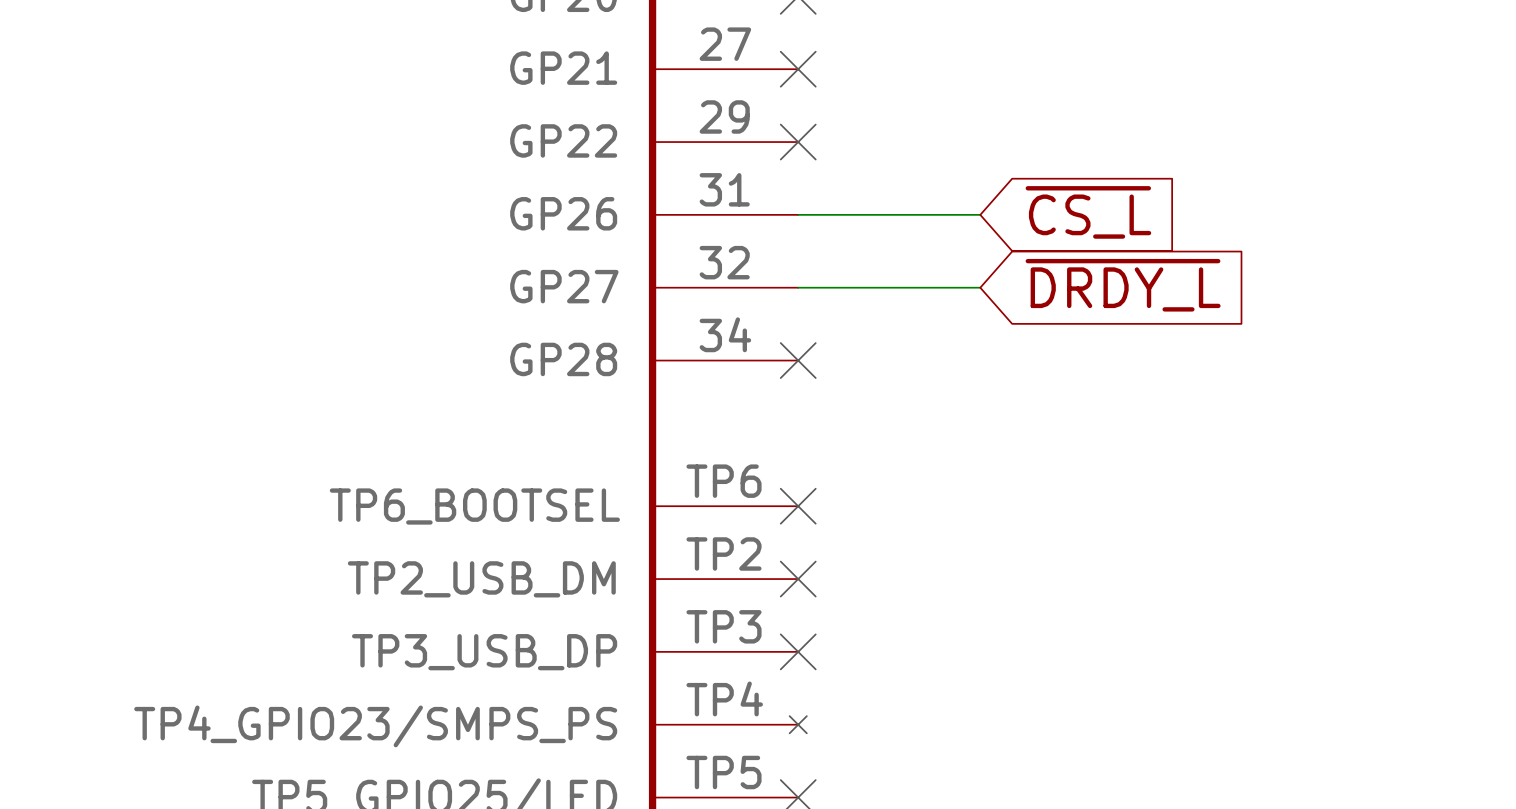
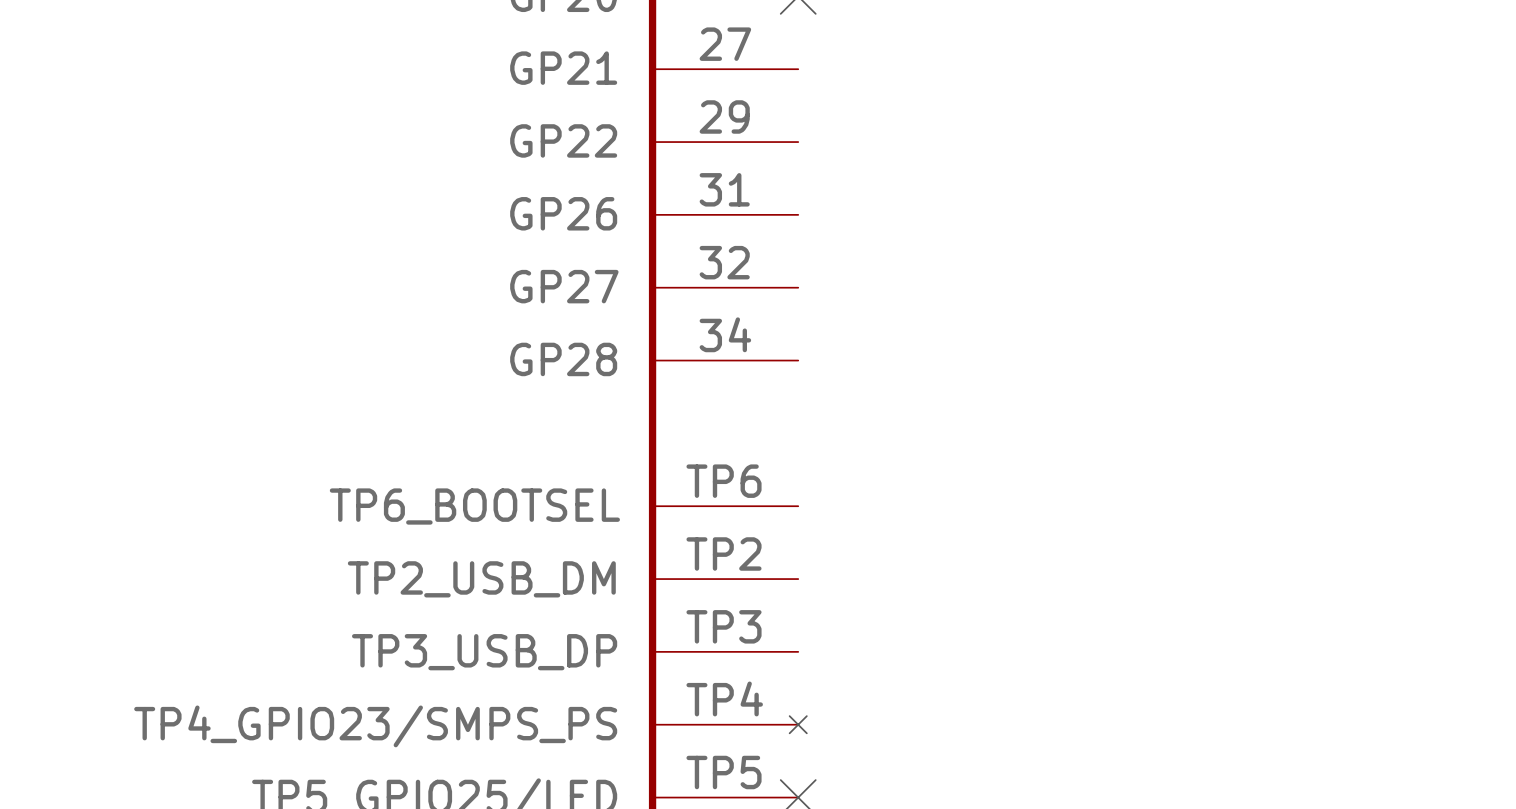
no-connect mark: (798, 69) -> none
no-connect mark: (798, 142) -> none
global label: ~{CS_L} (1088, 212) -> none
wire: (798, 214) (980, 214) -> none
global label: ~{DRDY_L} (1123, 285) -> none
wire: (798, 287) (980, 287) -> none
no-connect mark: (798, 360) -> none
no-connect mark: (798, 506) -> none
no-connect mark: (798, 579) -> none
no-connect mark: (798, 651) -> none

